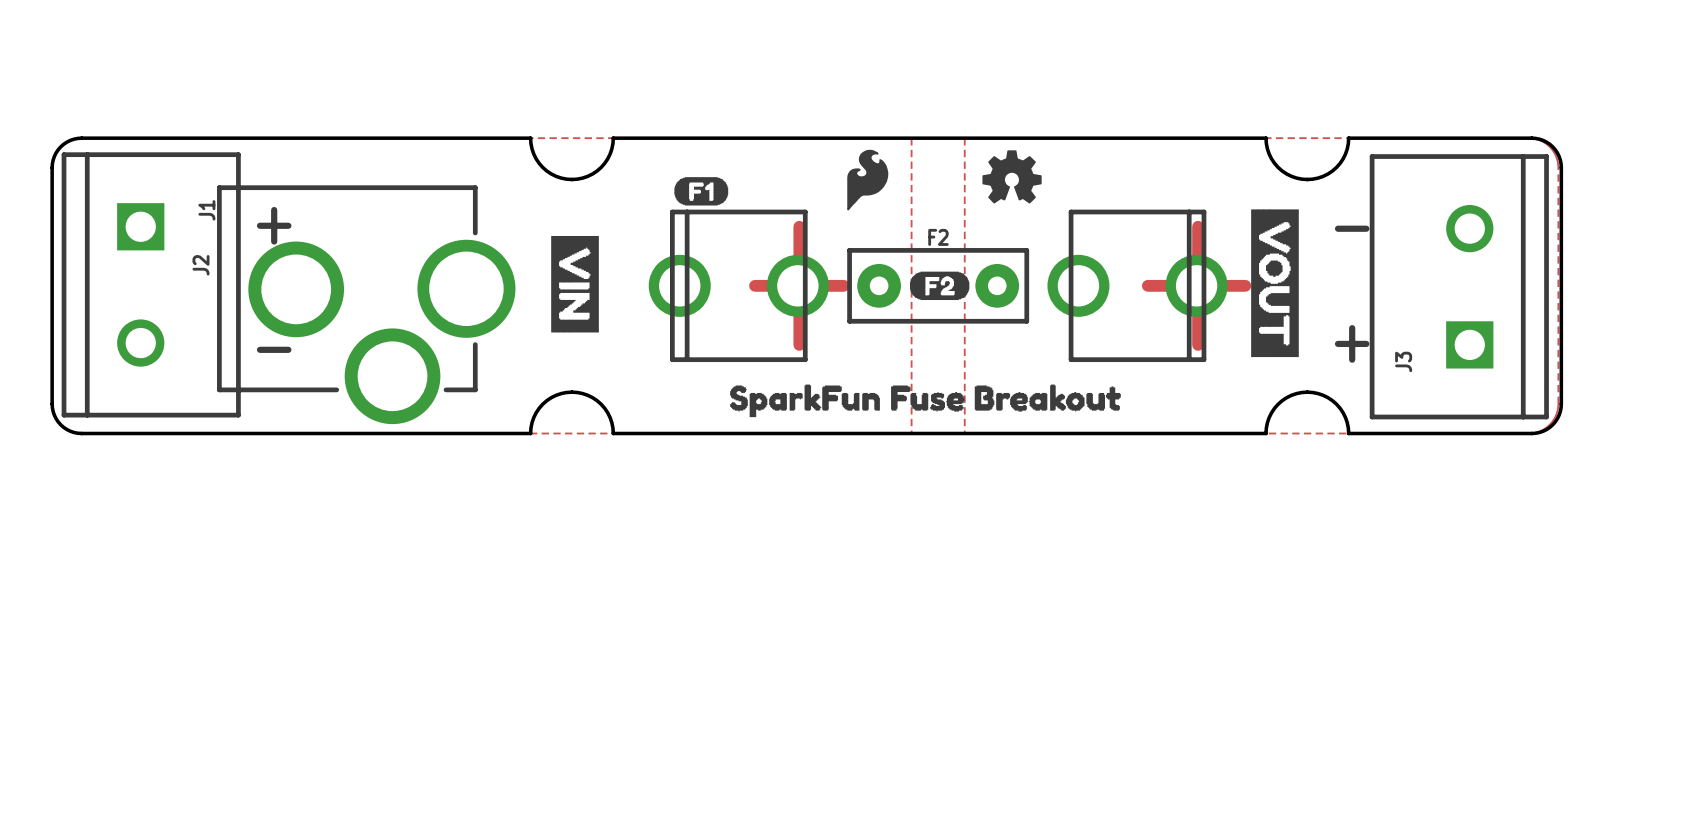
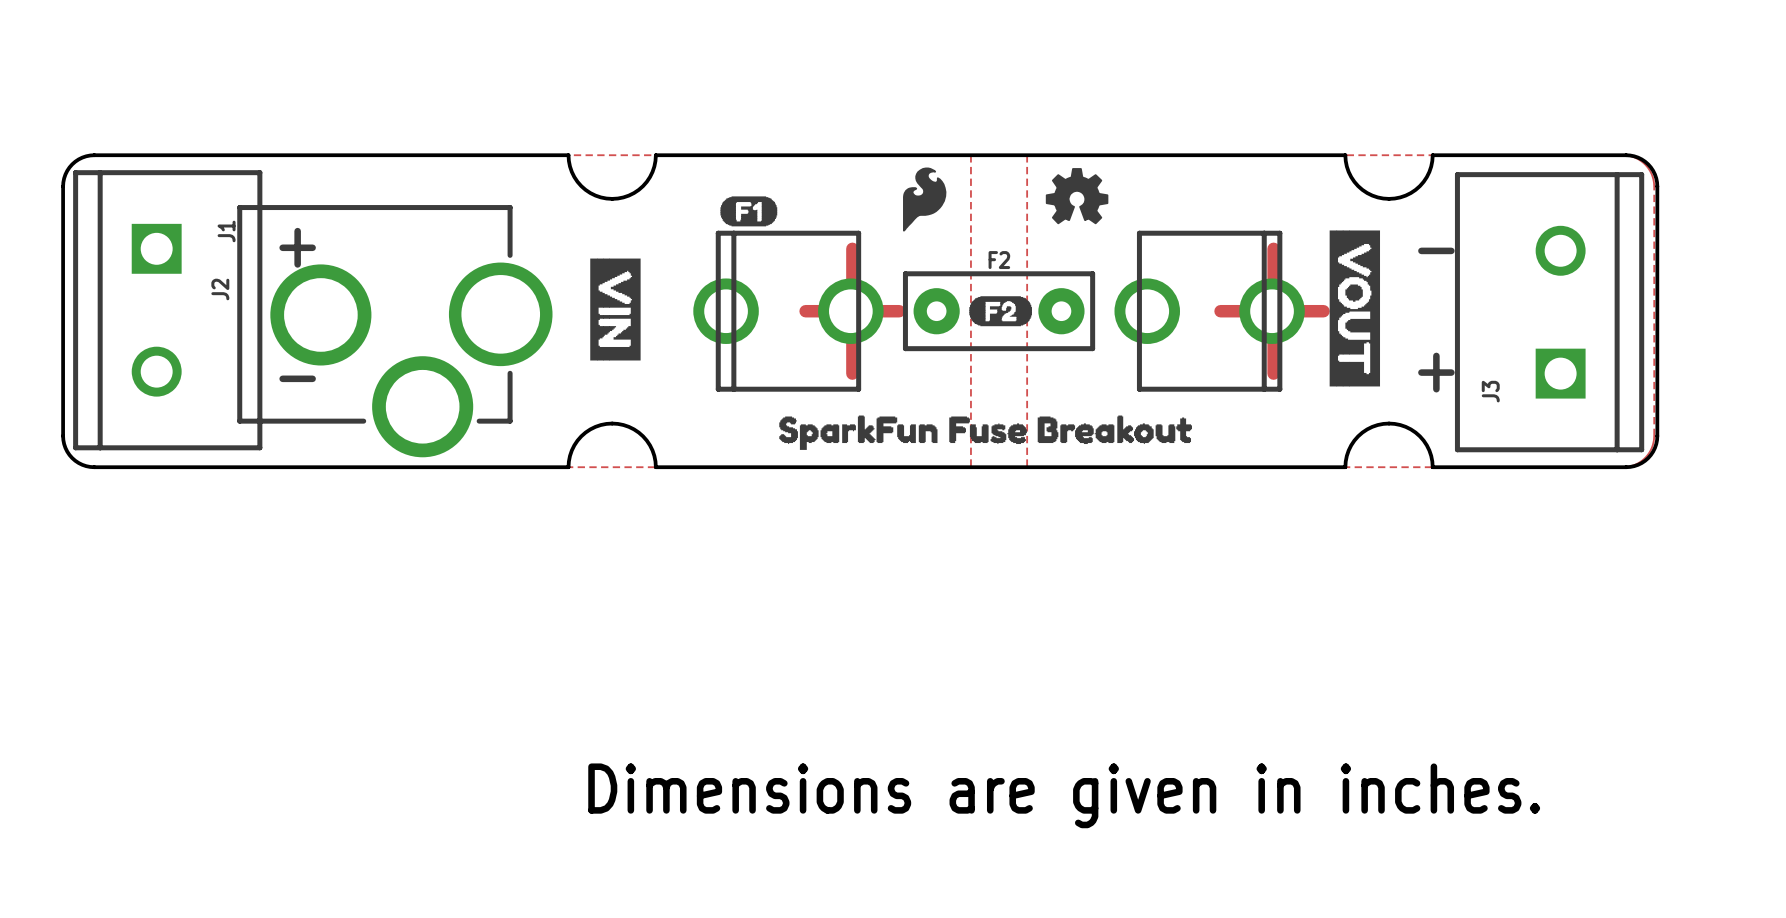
text: none -> Dimensions are given in inches. (1064, 795)

